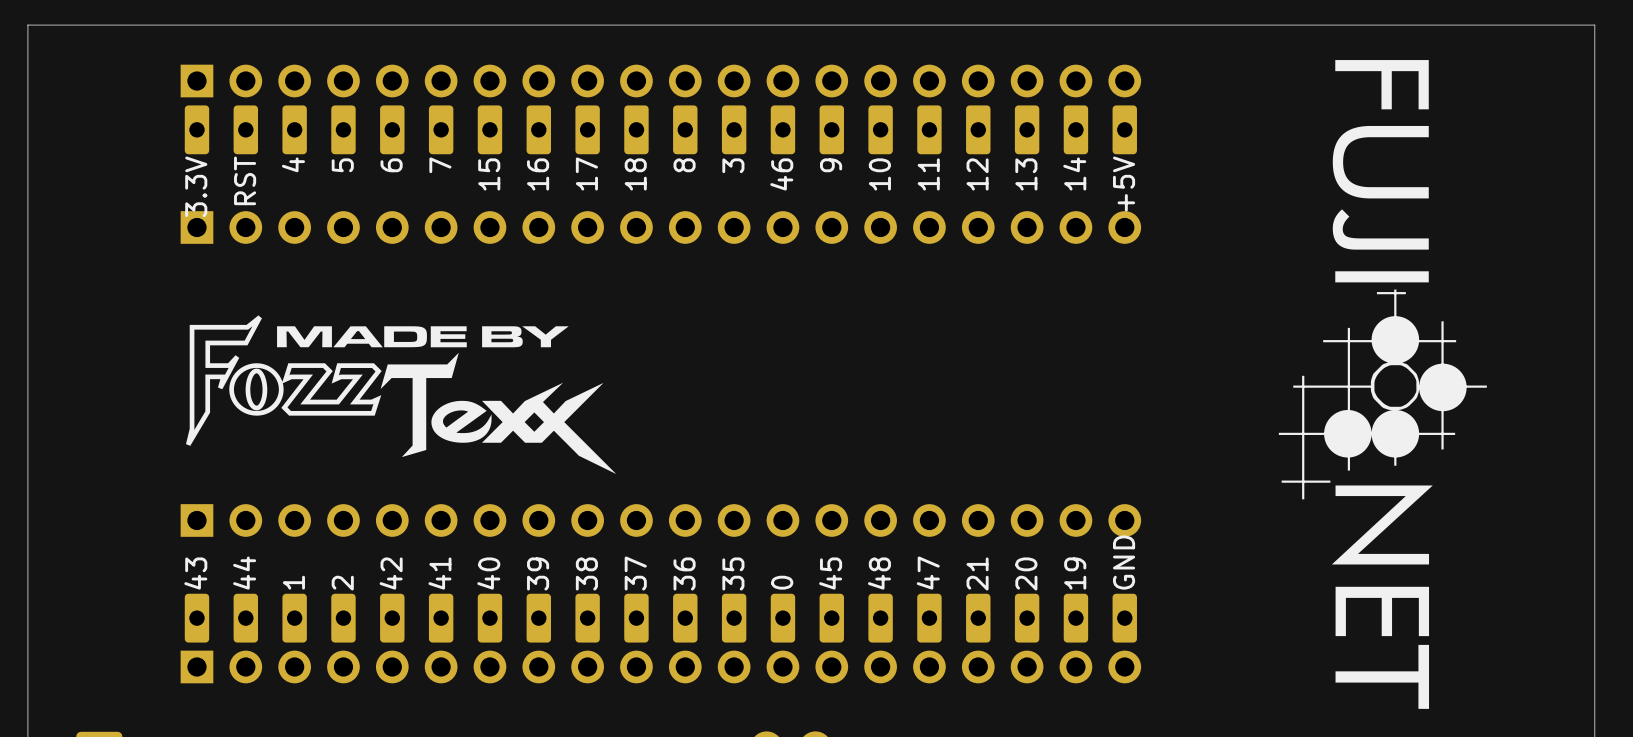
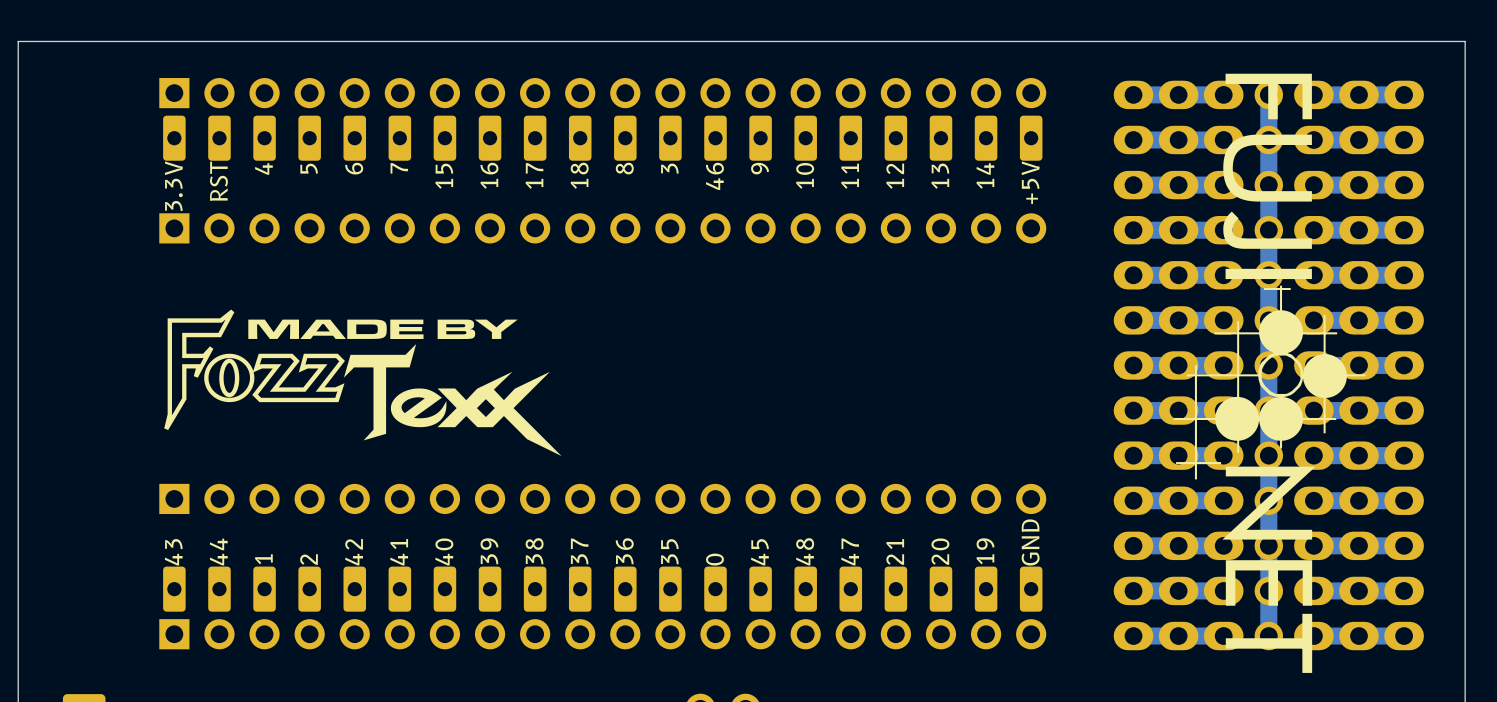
part: none -> (1268, 365)

